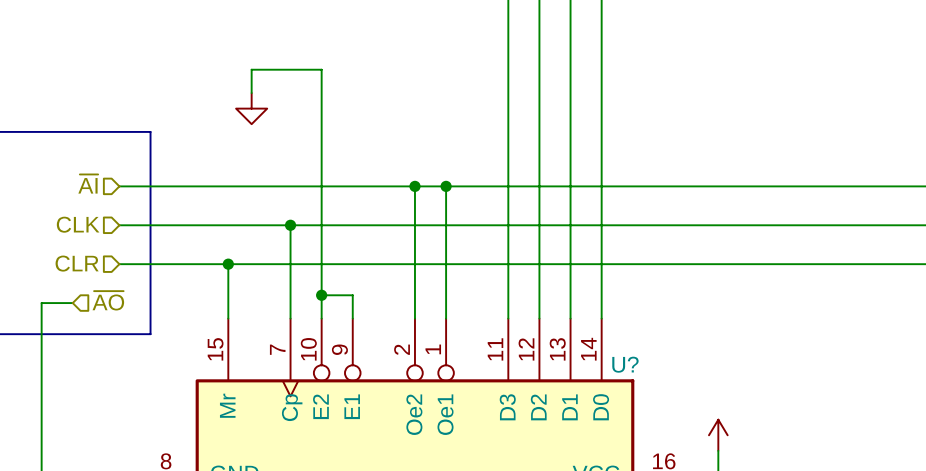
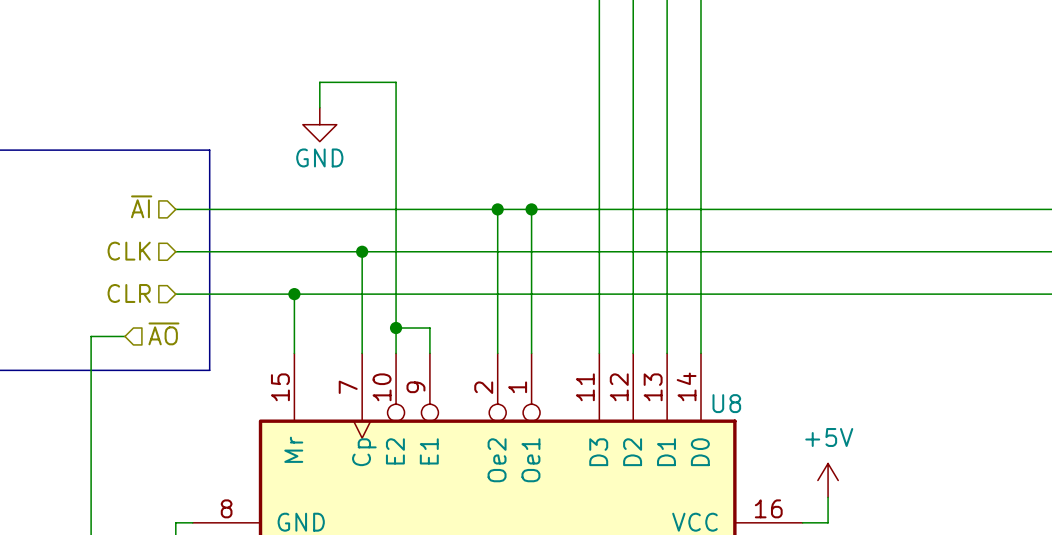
power symbol text: none -> GND (319, 157)
U? name: U? (625, 364) -> U8 (726, 403)
power symbol text: none -> +5V (829, 437)

